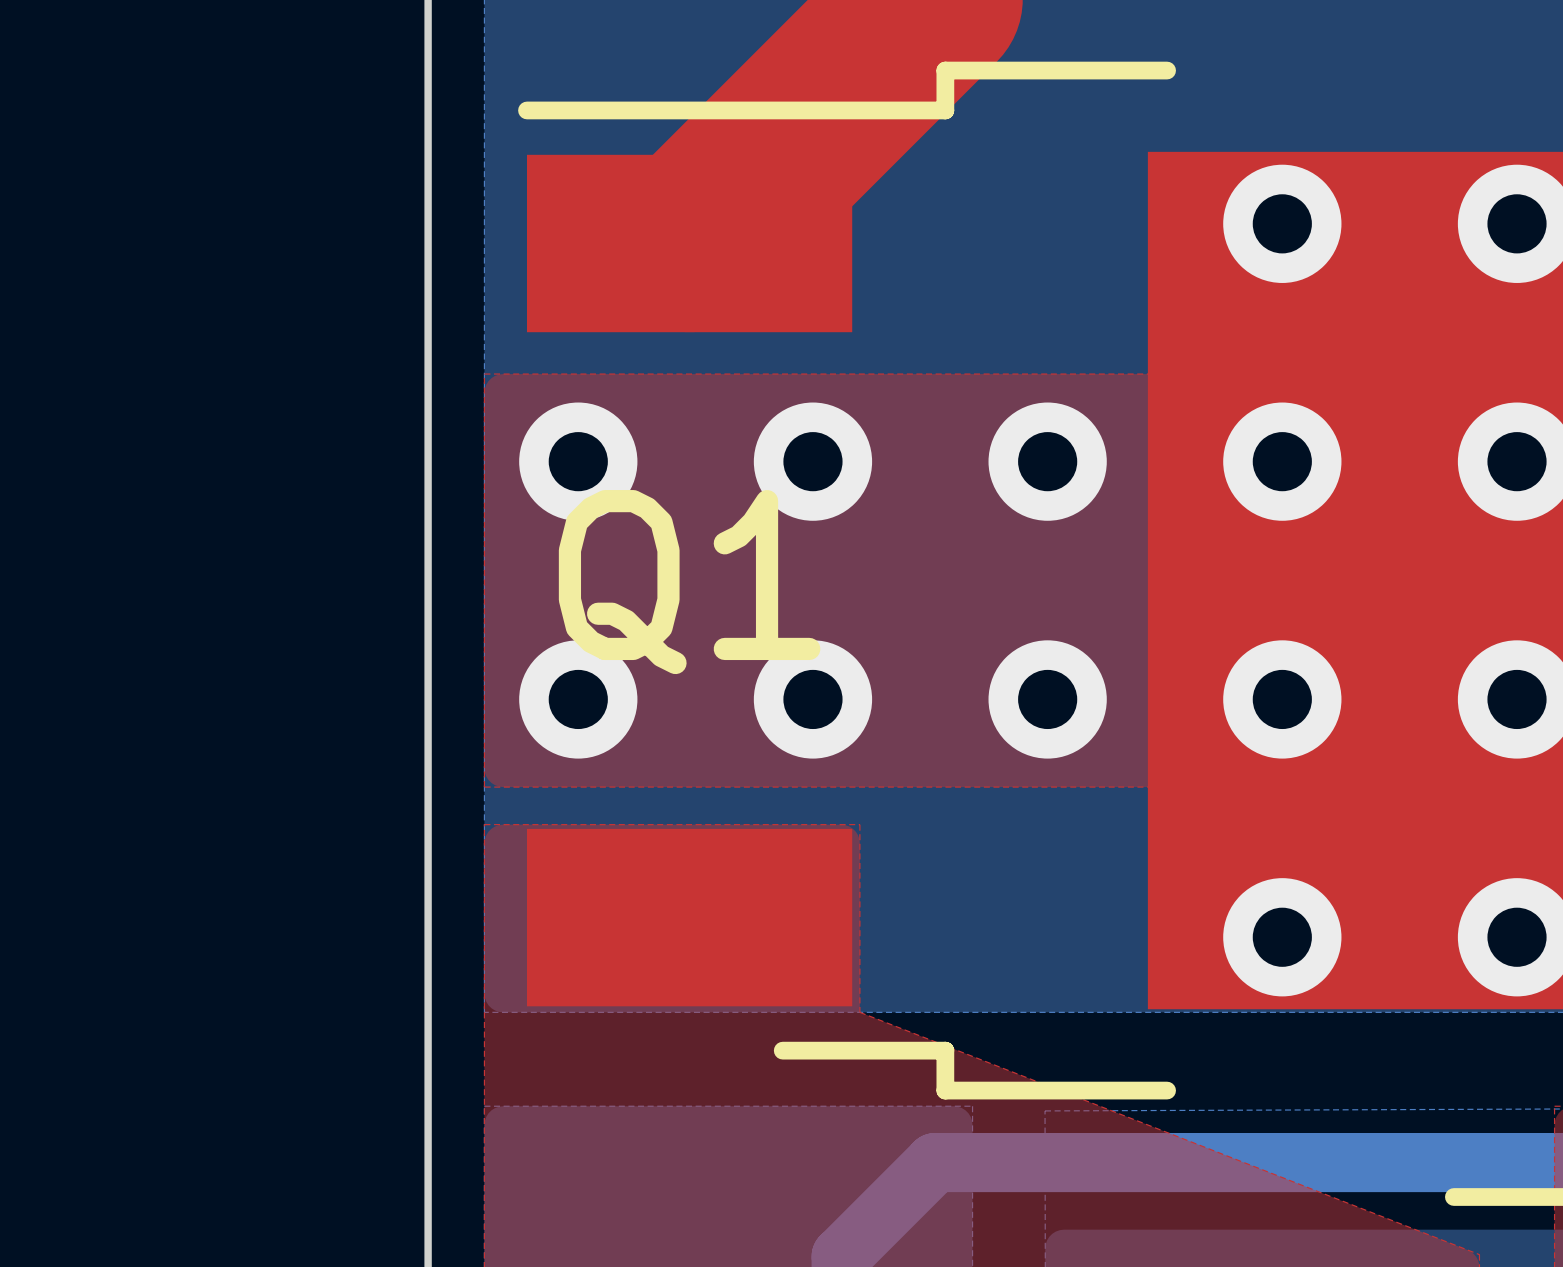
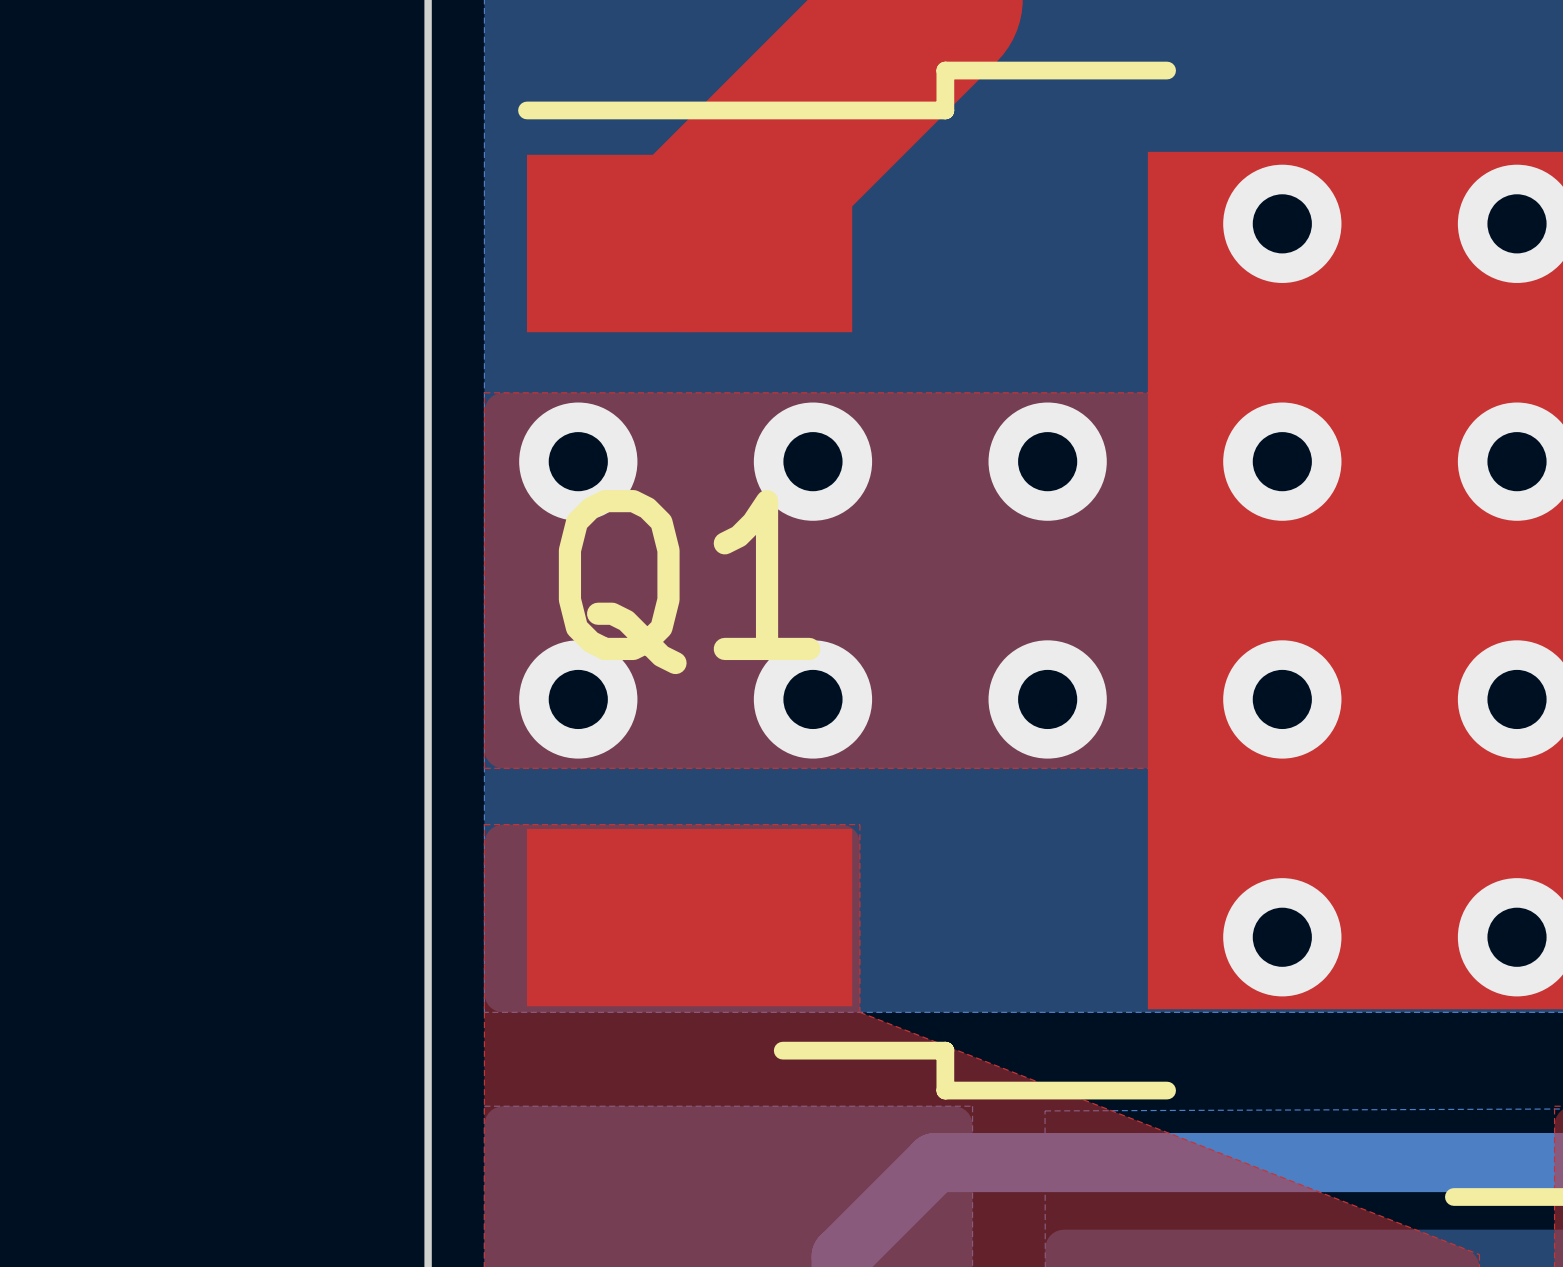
top zone outline: (484, 392) (484, 374) (1479, 374) (1479, 392) -> (484, 392) (1479, 392)
top zone outline: (484, 768) (484, 787) (1479, 787) (1479, 768) -> (484, 768) (1479, 768)

